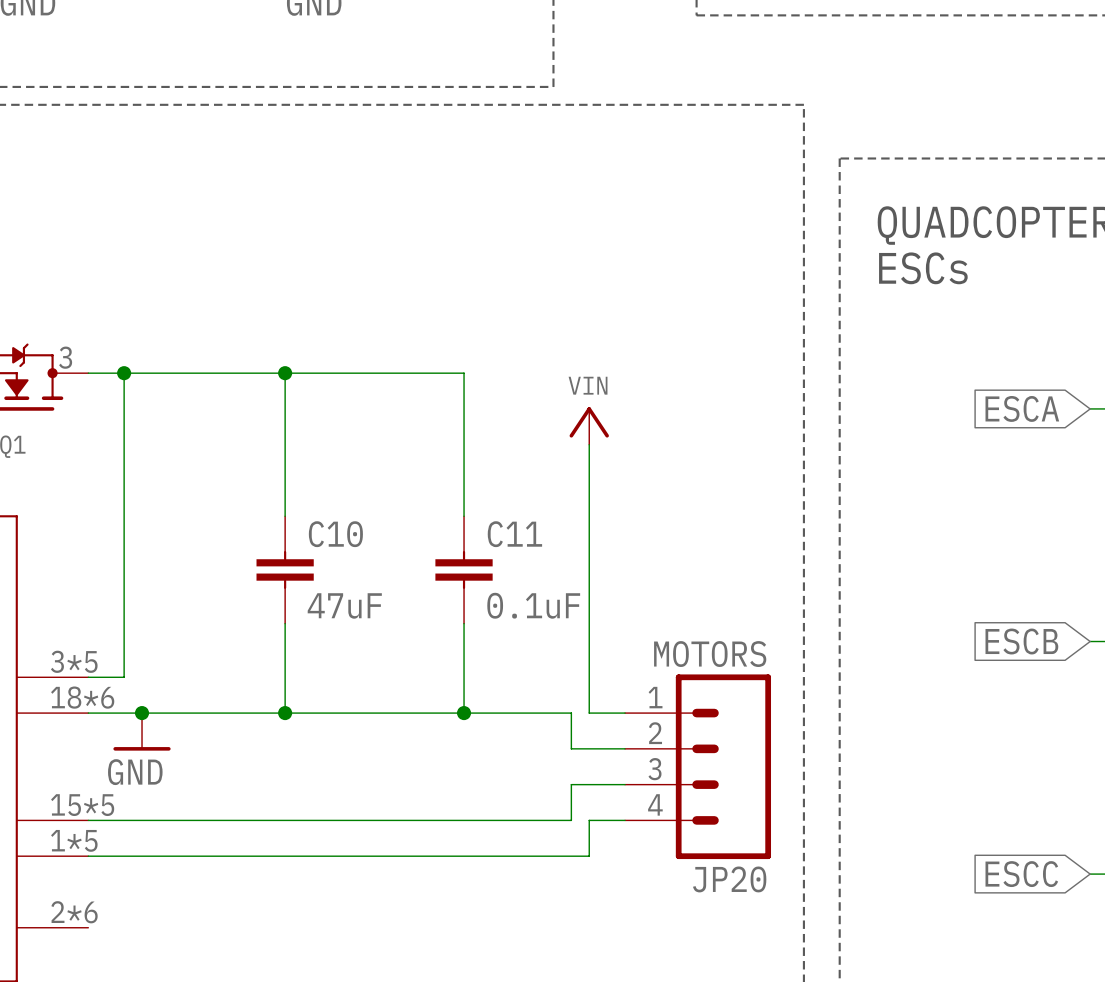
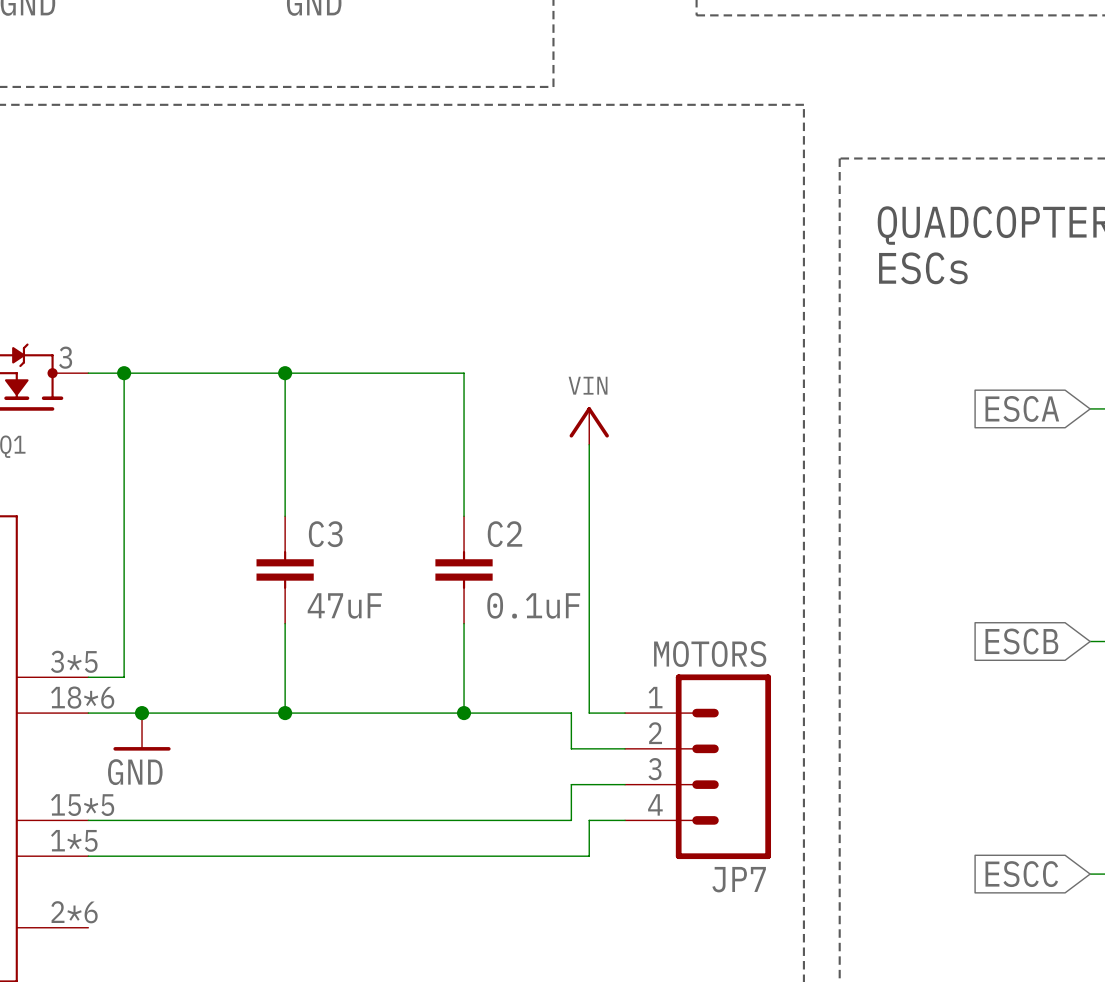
C10 name: C10 (335, 534) -> C3 (325, 534)
C11 name: C11 (514, 534) -> C2 (504, 534)
JP20 name: JP20 (729, 879) -> JP7 (739, 879)

